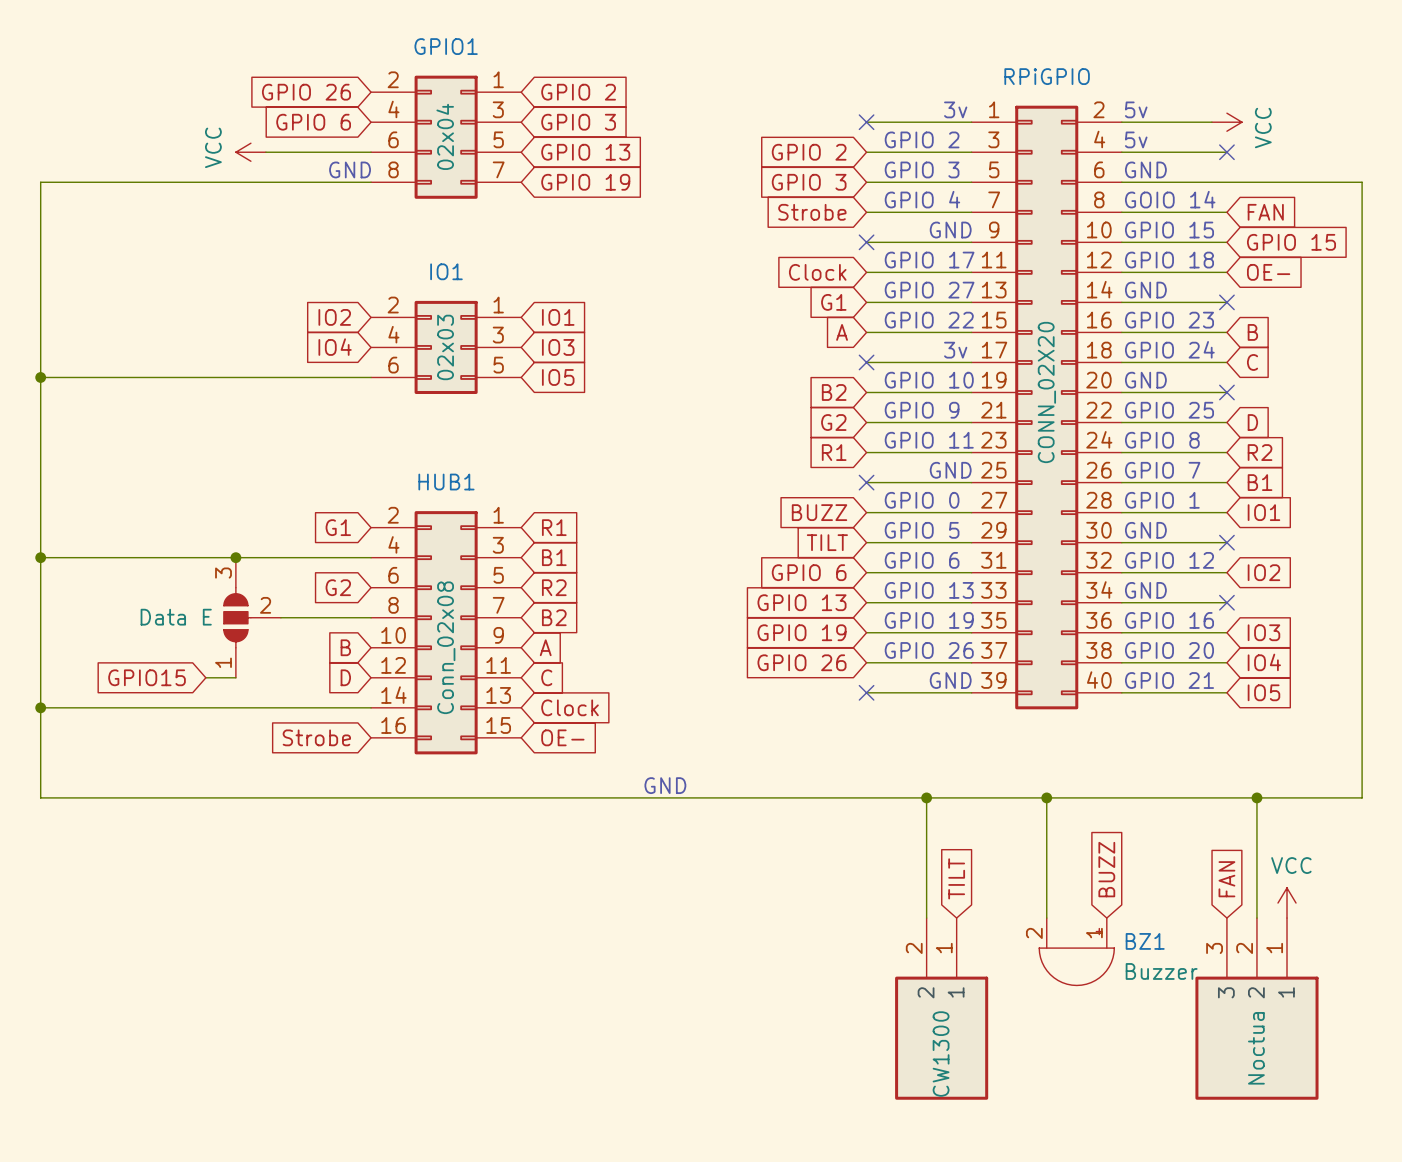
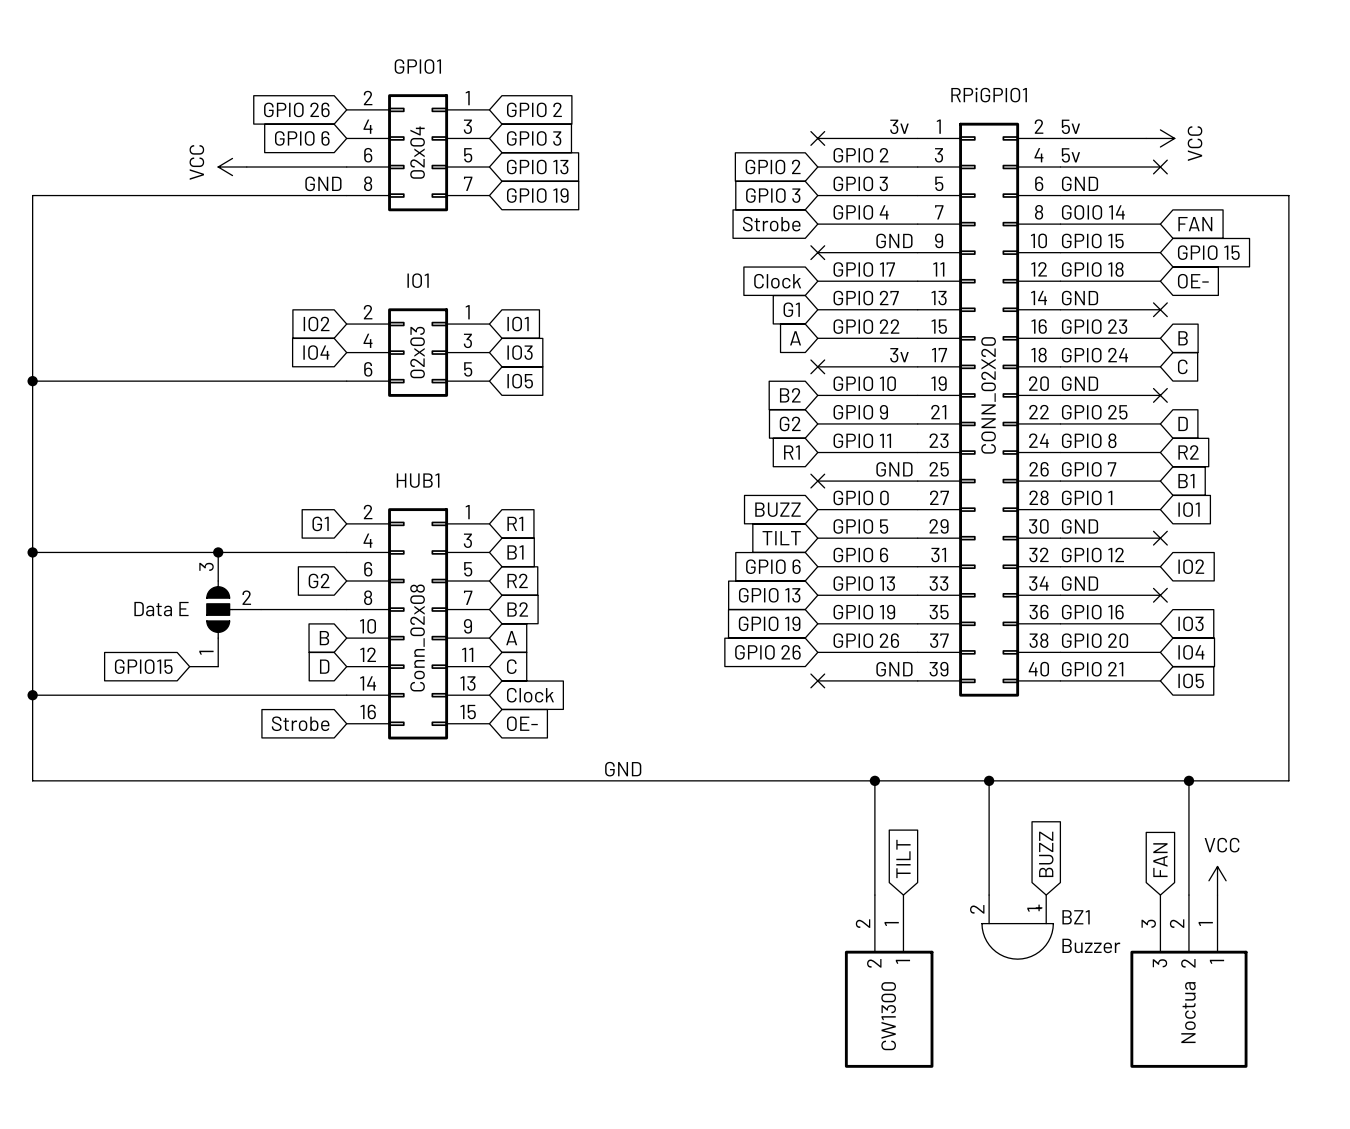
RPiGPIO name: RPiGPIO (1047, 76) -> RPiGPIO1 (989, 95)

